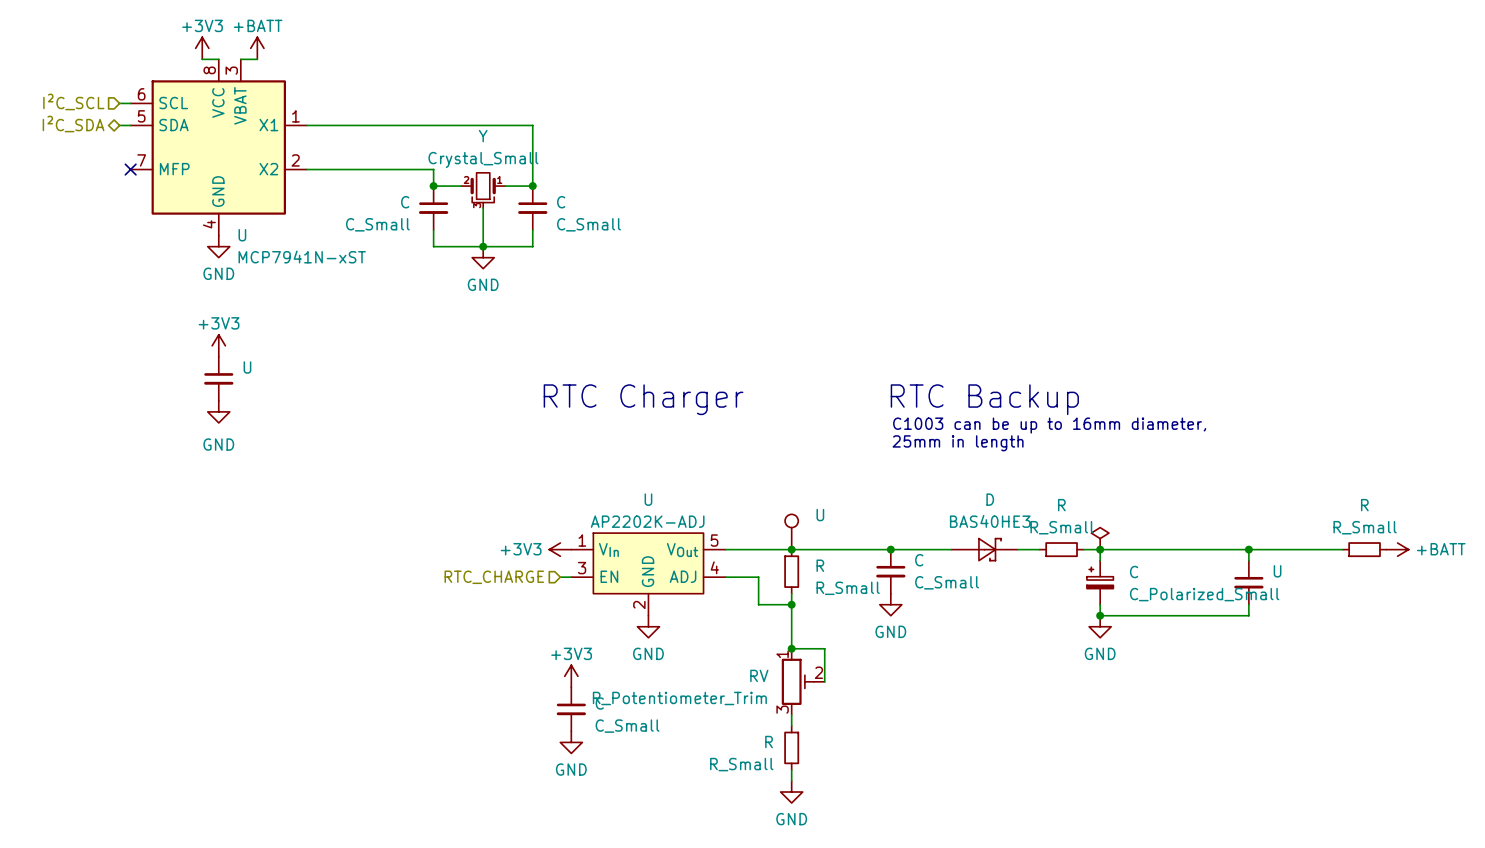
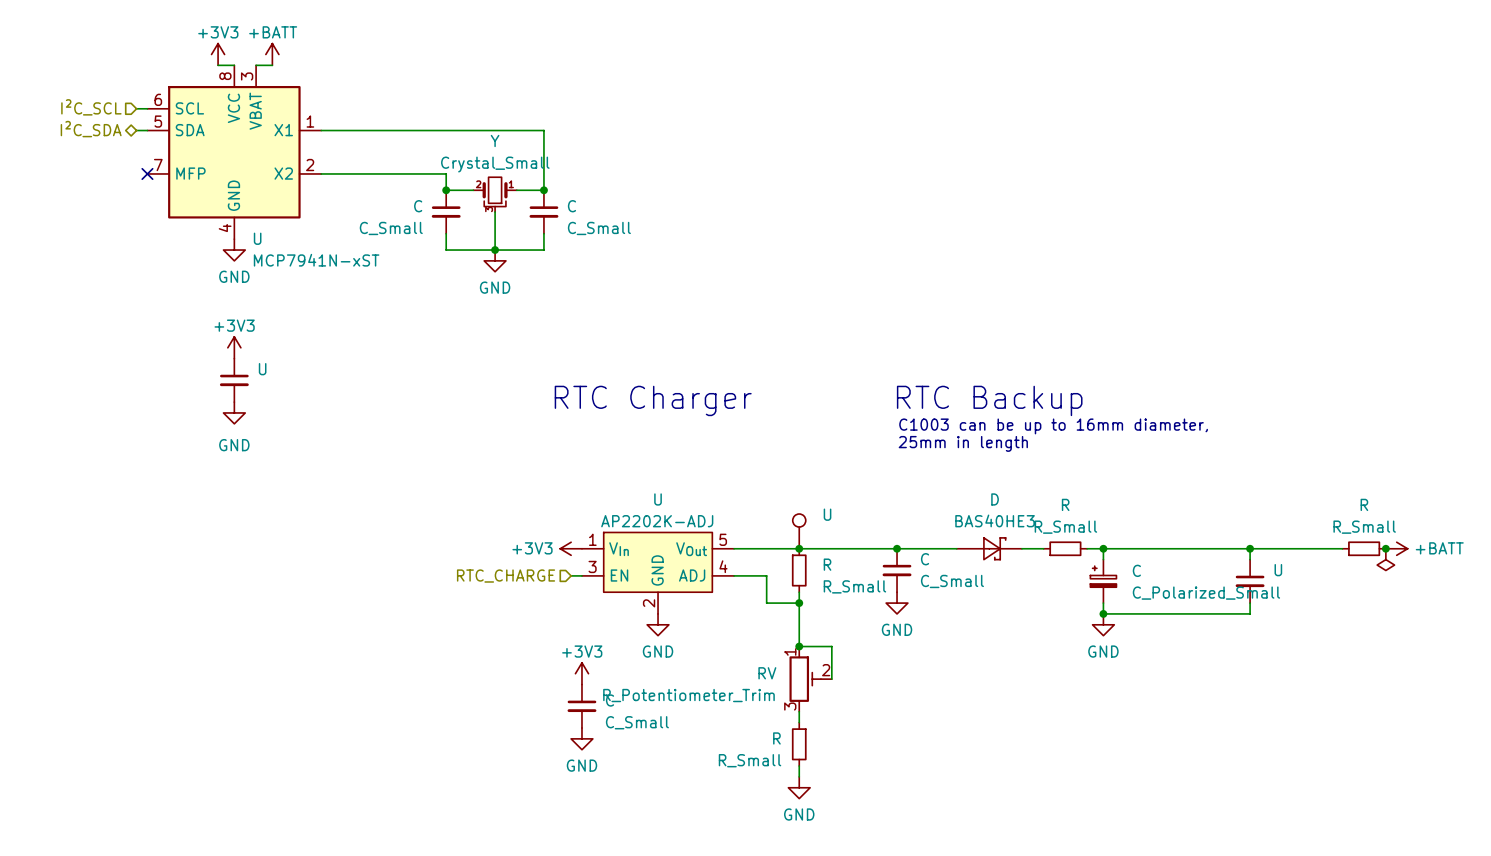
power symbol: (1100, 538) -> none
junction: none -> (1385, 548)
power symbol: none -> (1385, 559)

